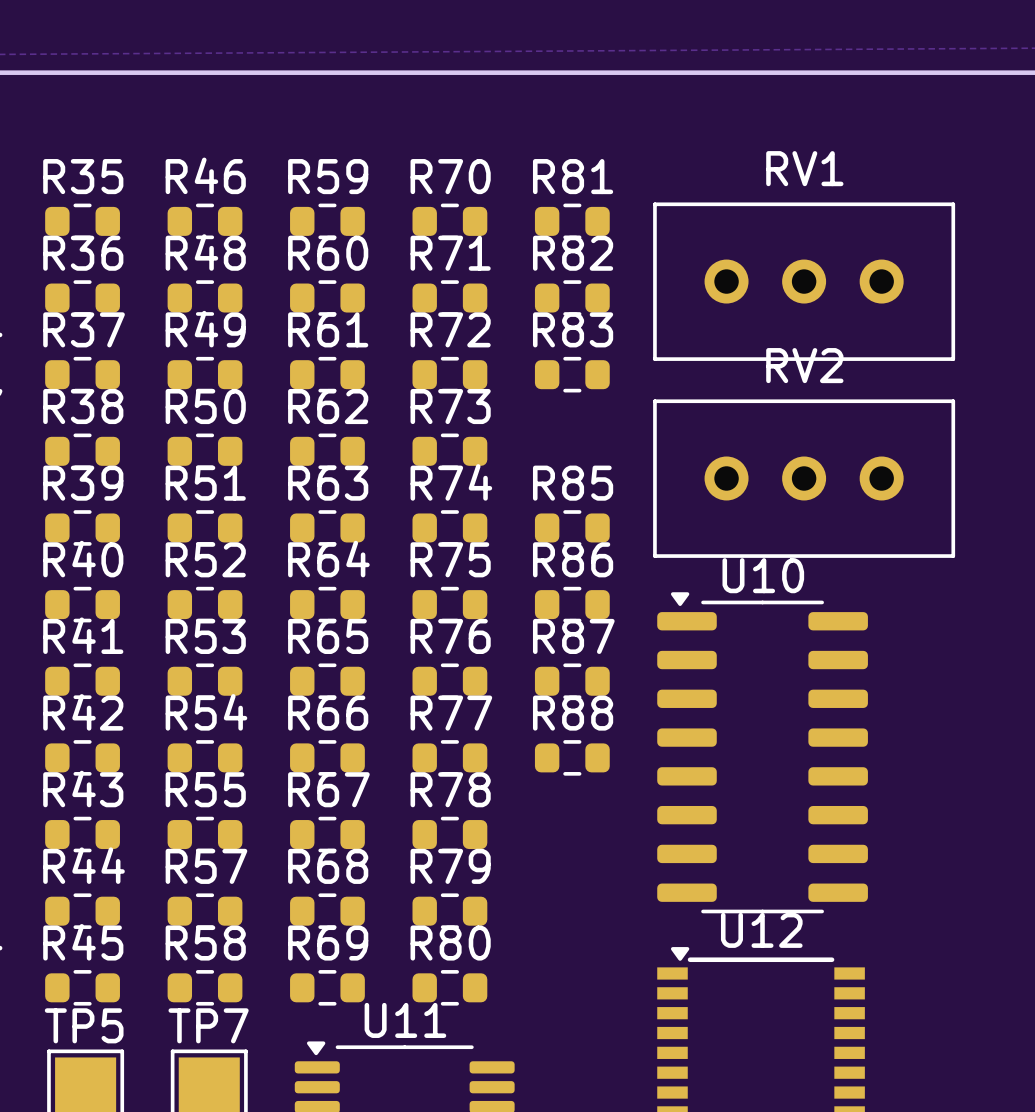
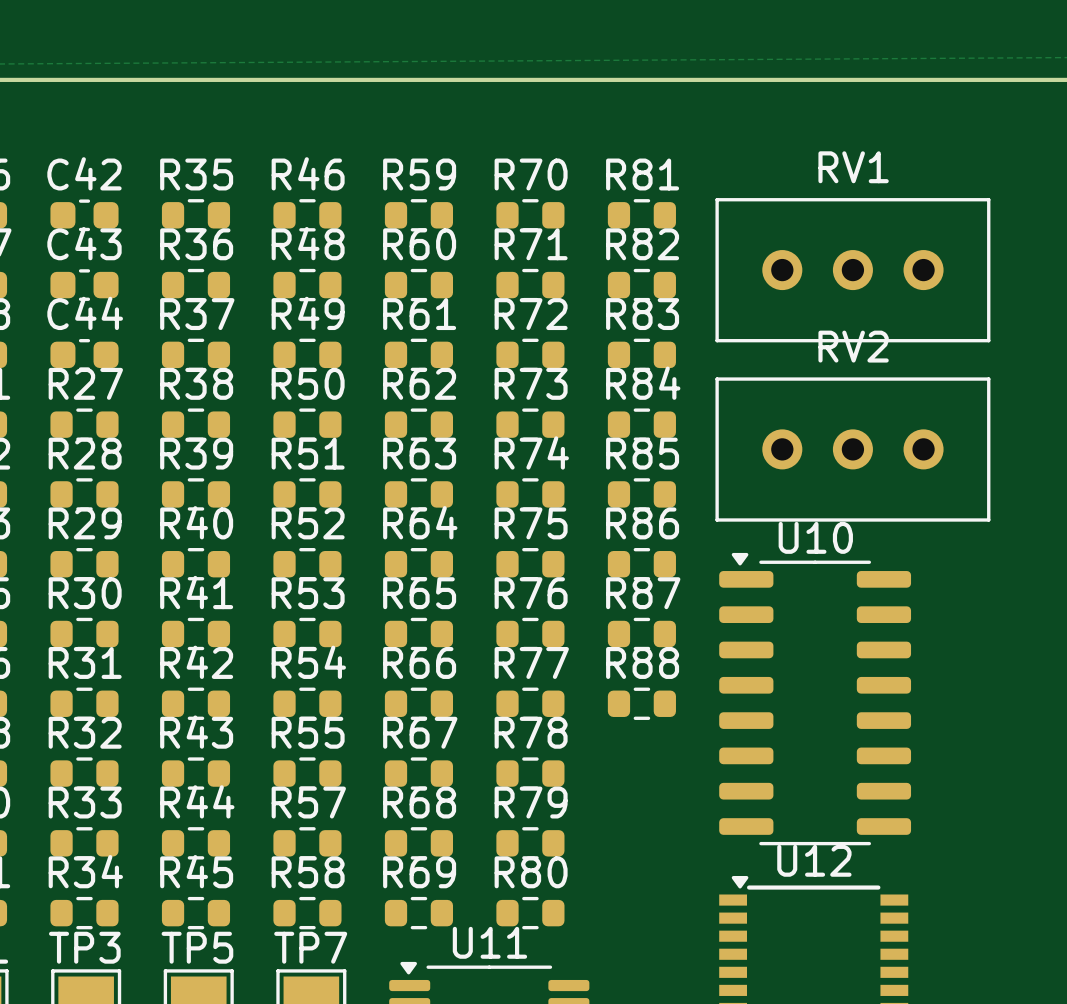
R84: none -> (641, 424)

